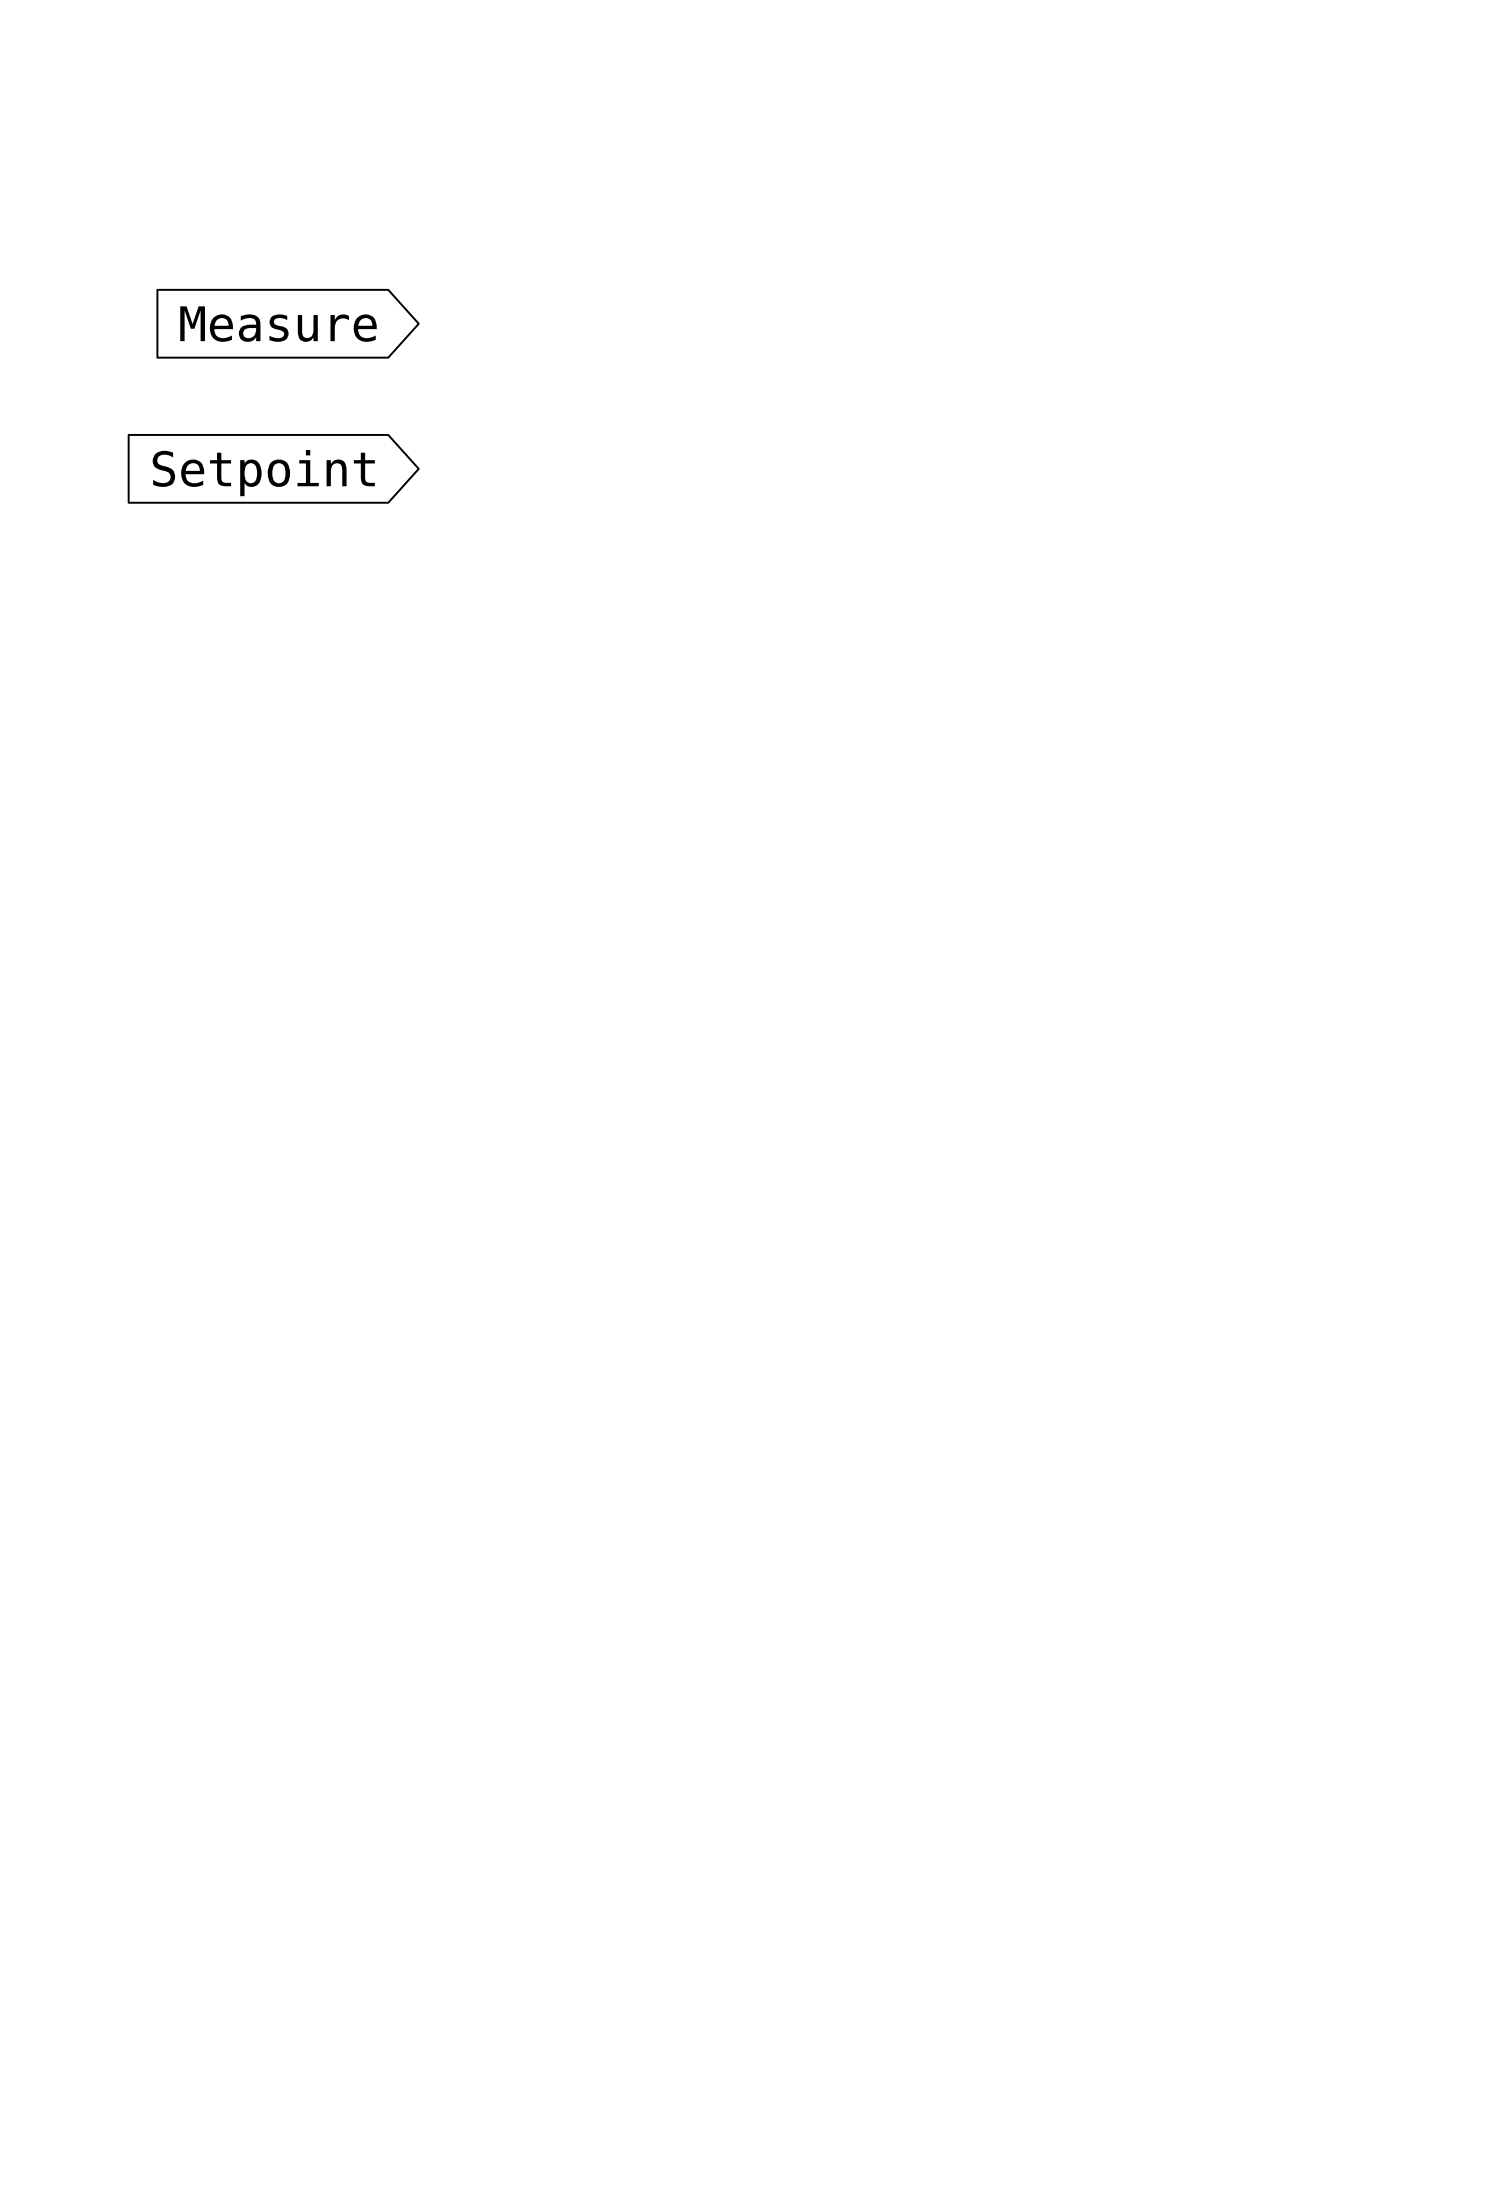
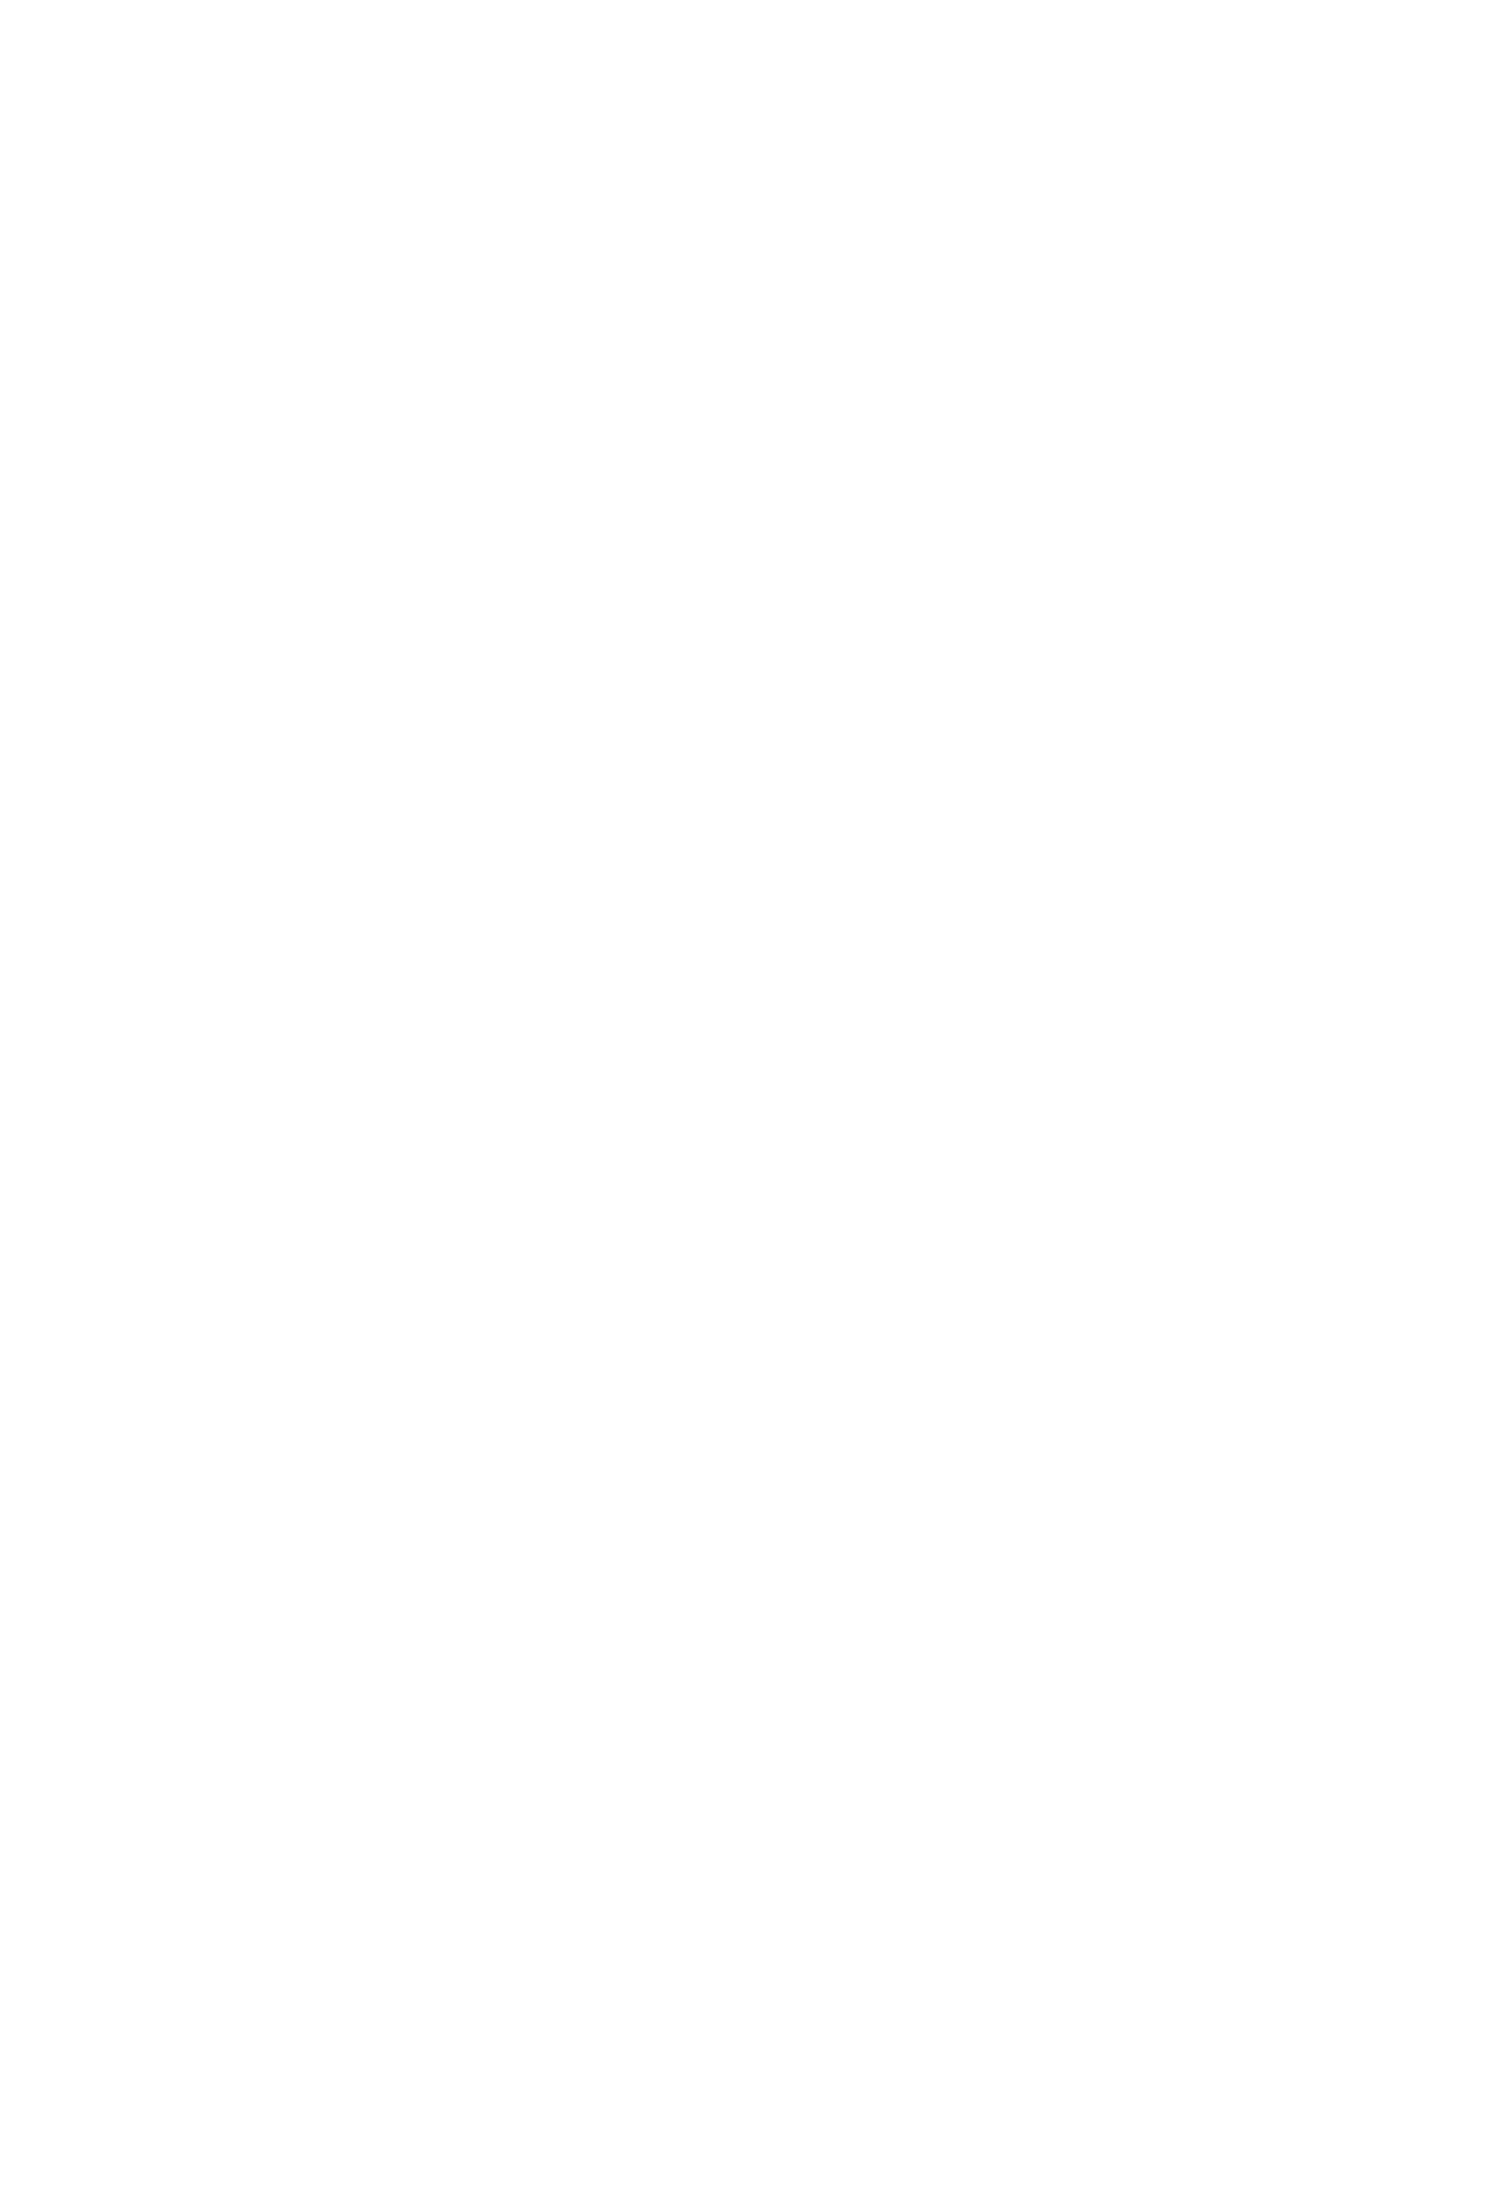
global label: Measure (278, 324) -> none
global label: Setpoint (263, 473) -> none

